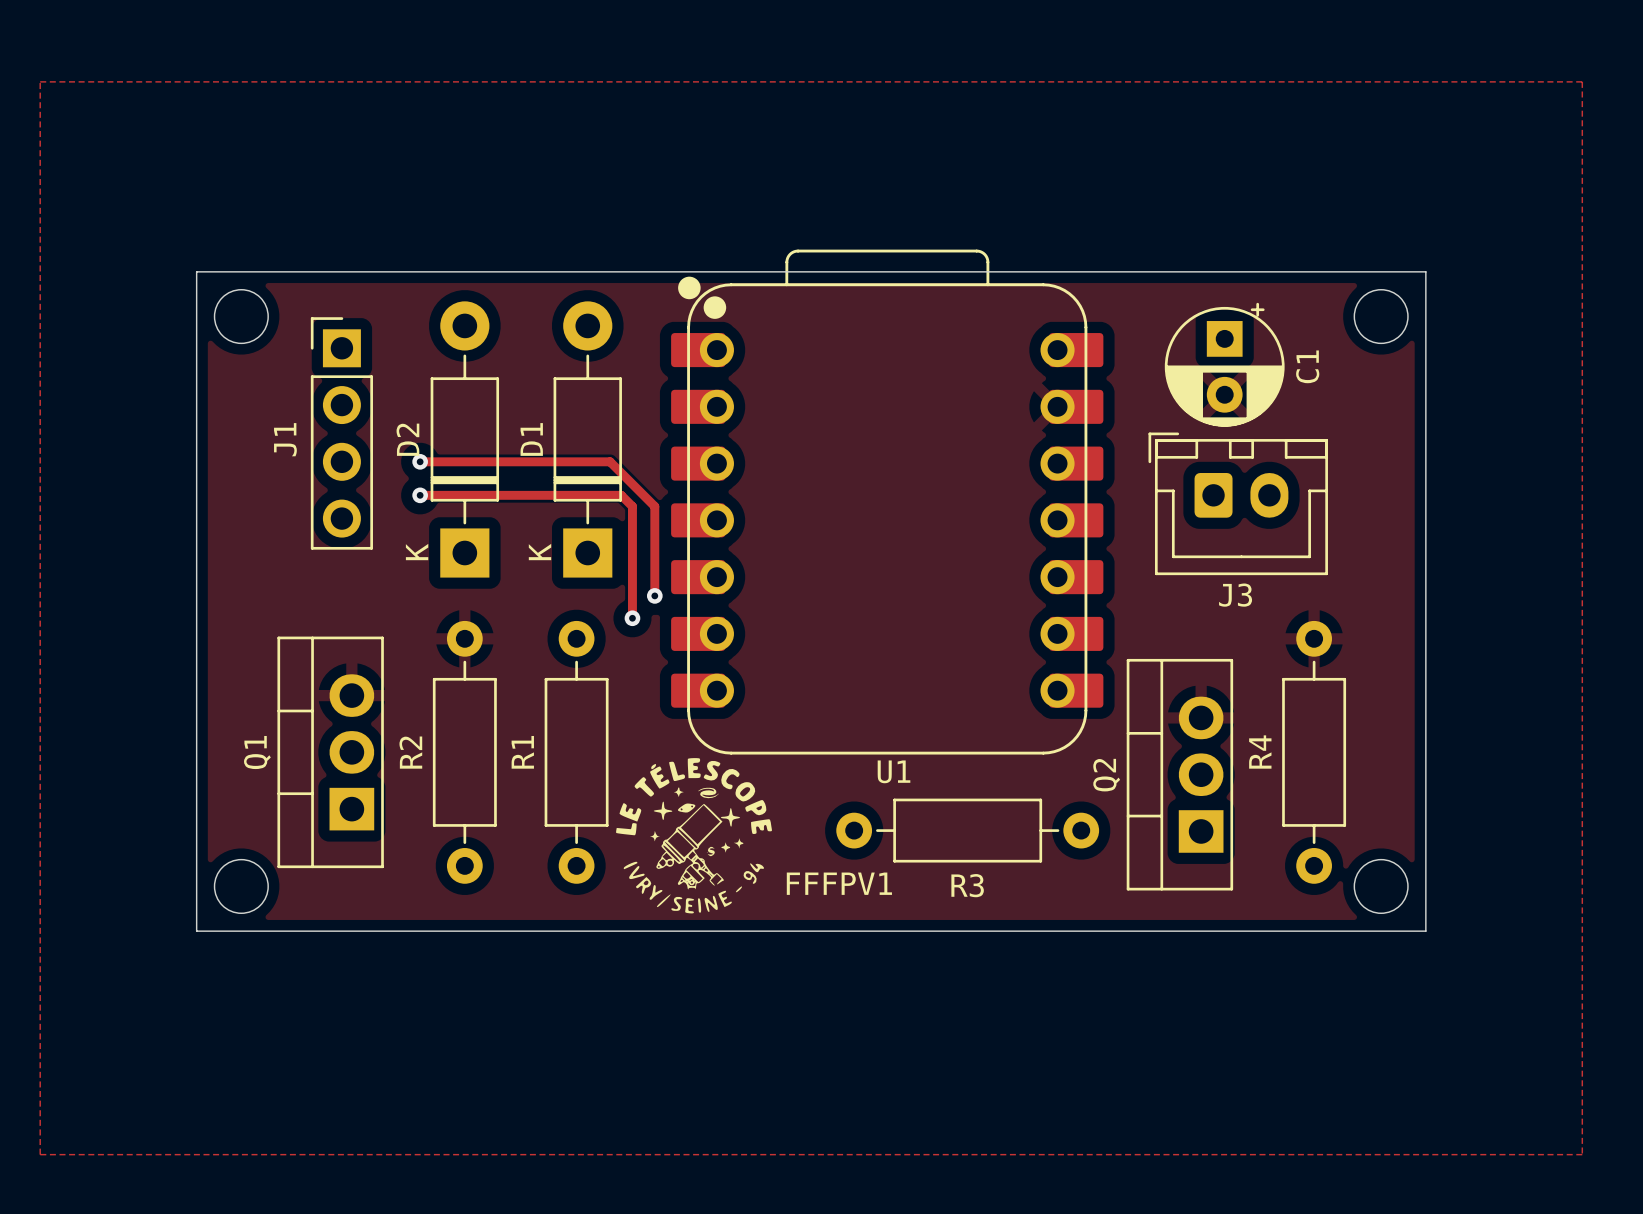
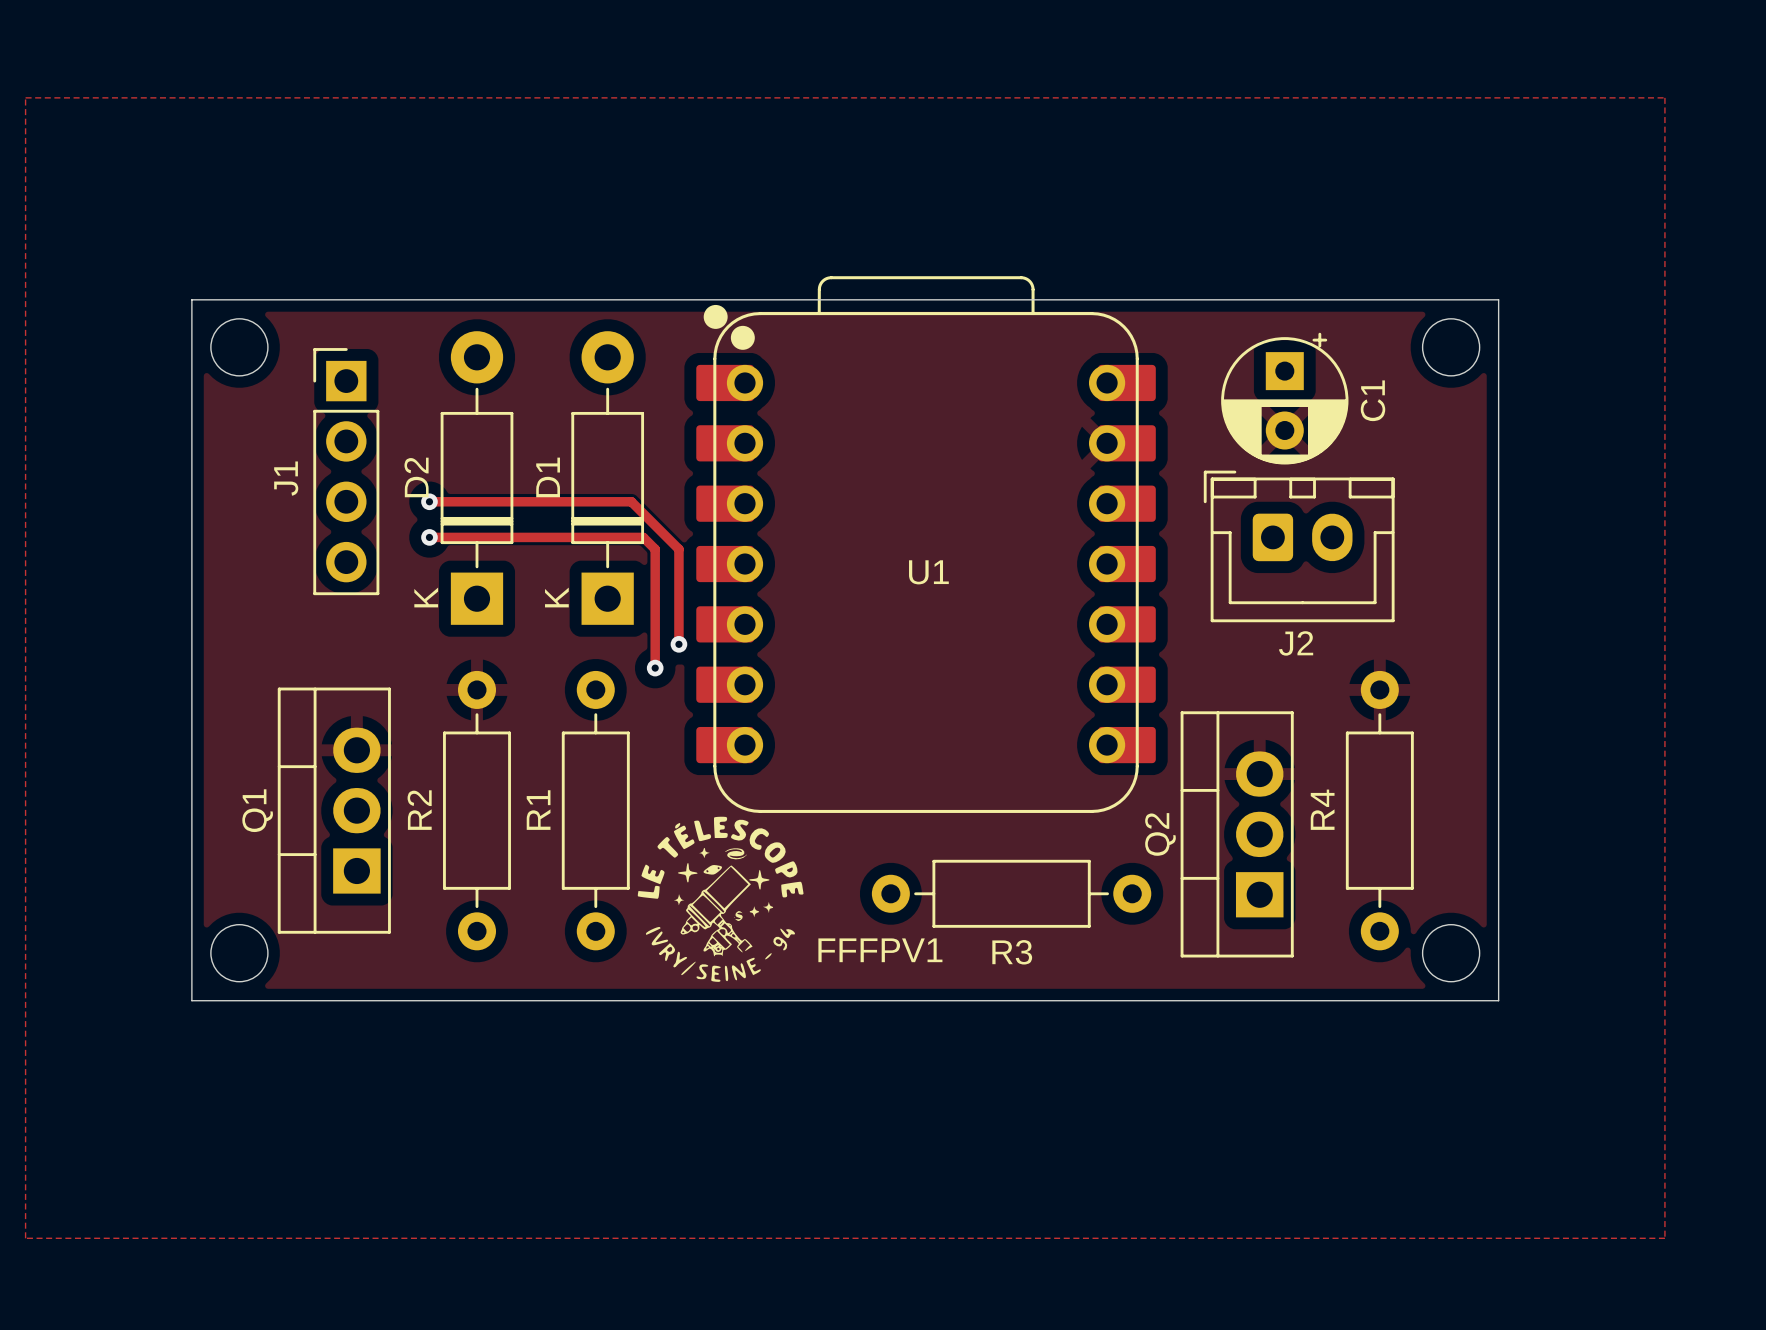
J3 name: J3 (1235, 595) -> J2 (1296, 643)
U1 name position: U1 (894, 771) -> U1 (928, 572)

